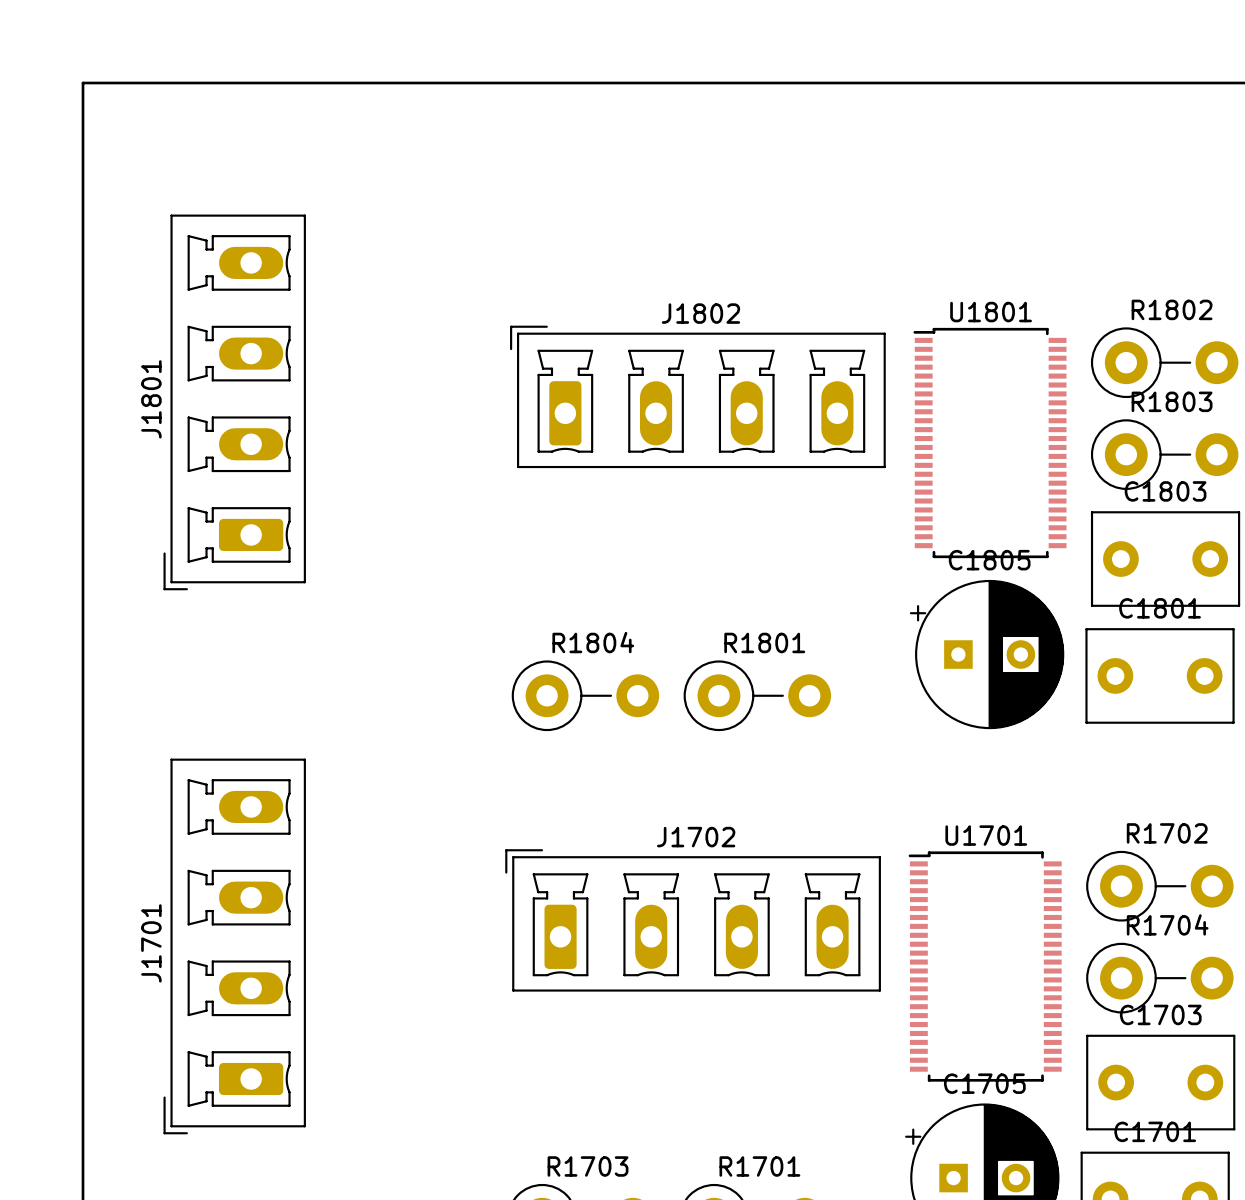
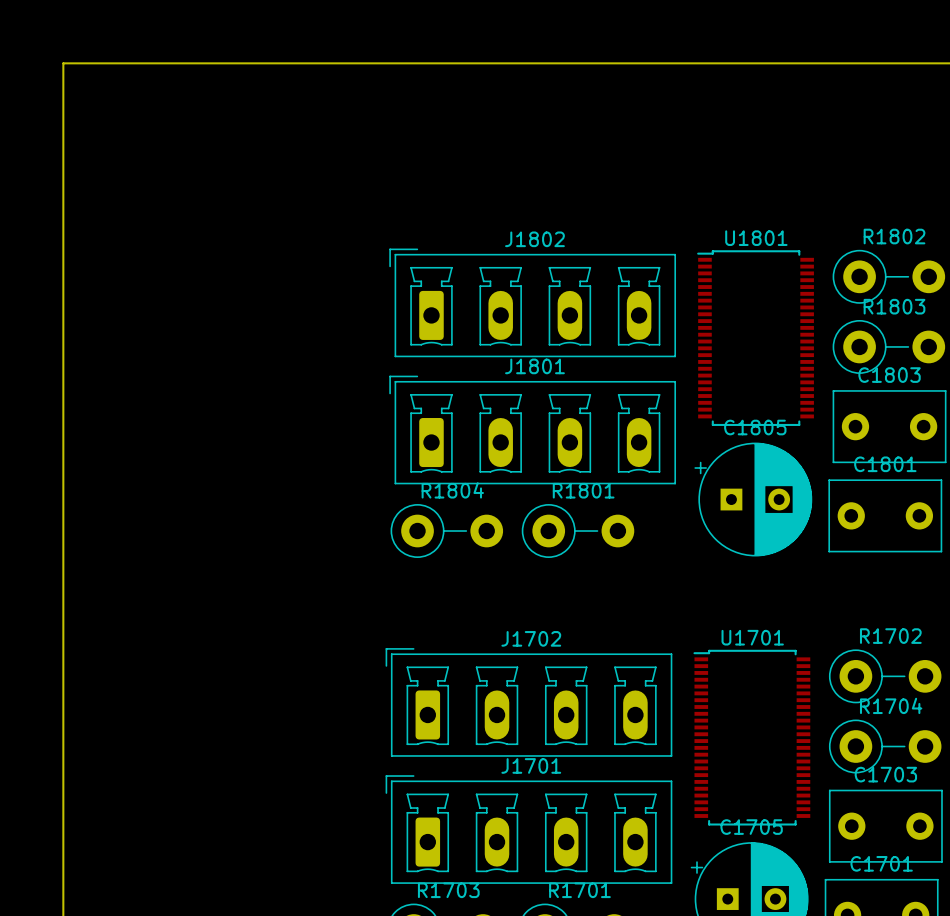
J1801 rotation: 0° (234, 402) -> 90° clockwise (532, 429)
J1801 position: (234, 402) -> (532, 429)
J1701 rotation: 0° (234, 946) -> 90° clockwise (528, 829)
J1701 position: (234, 946) -> (528, 829)

